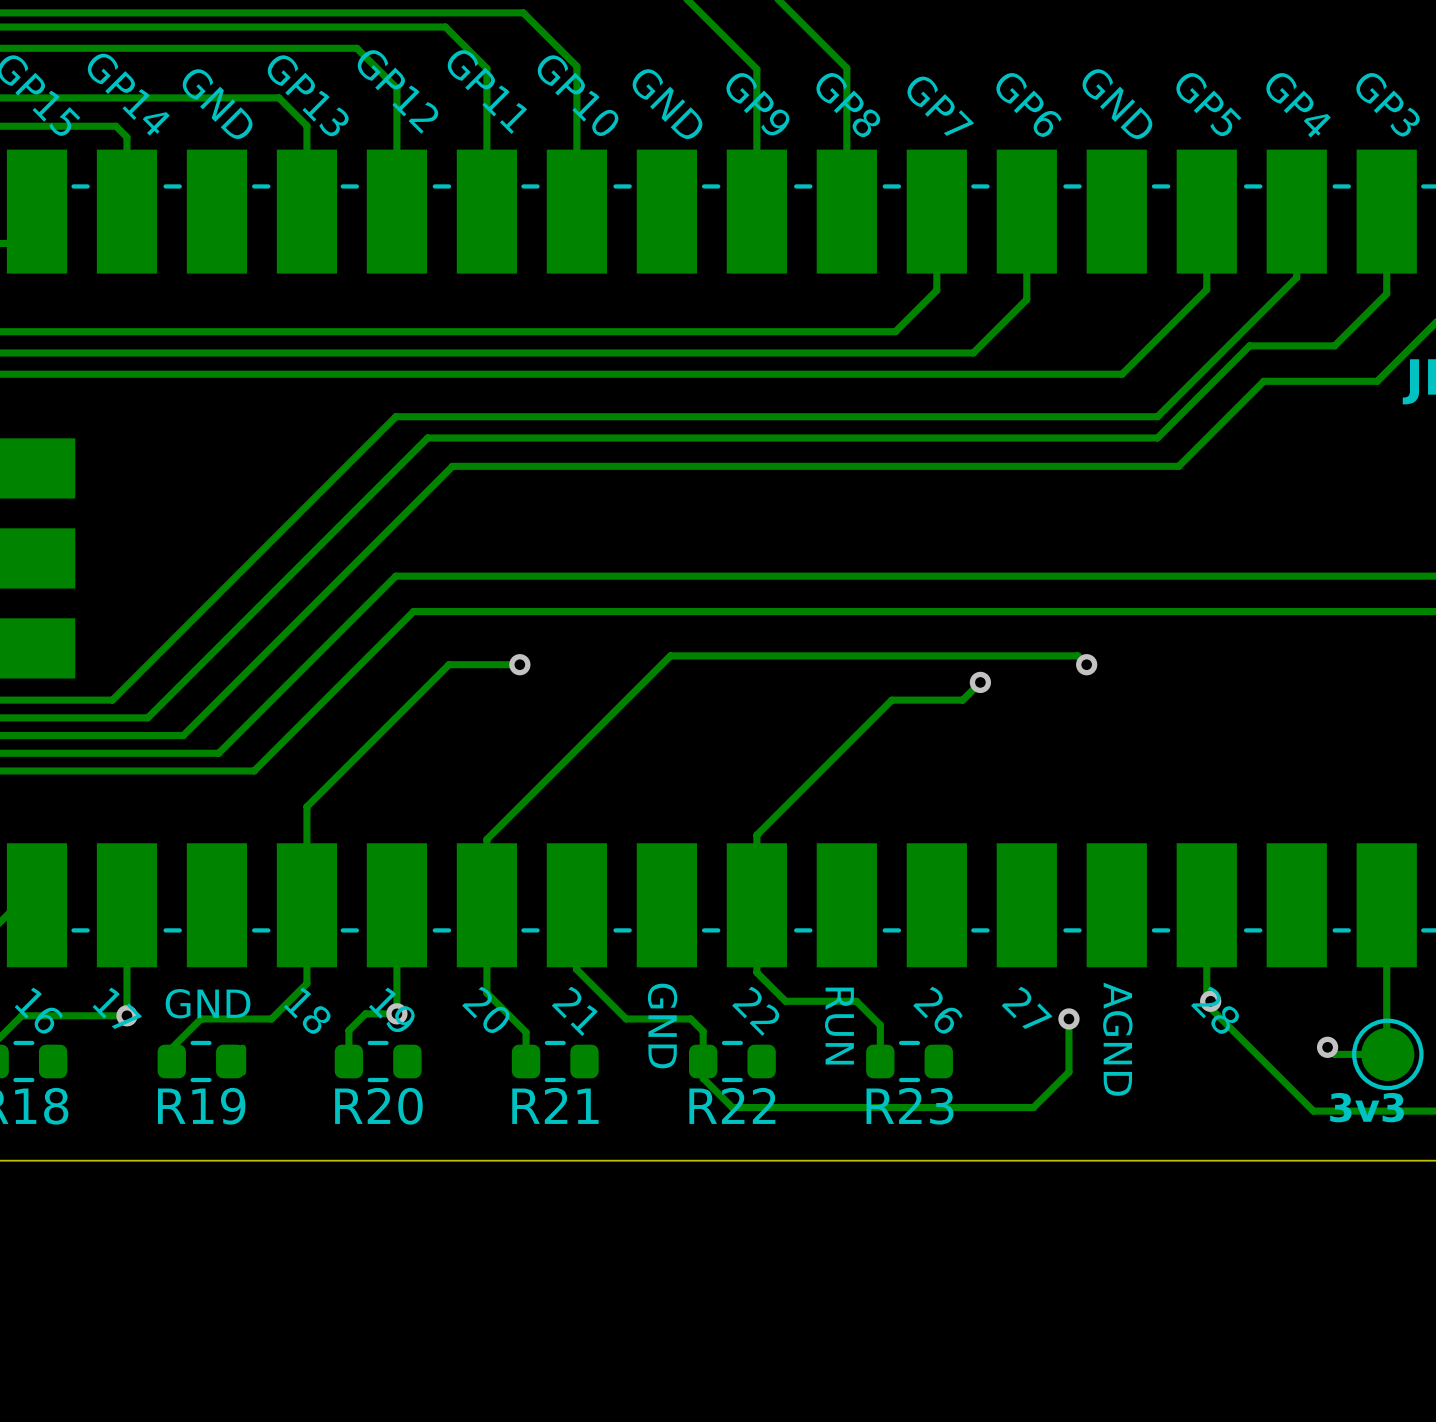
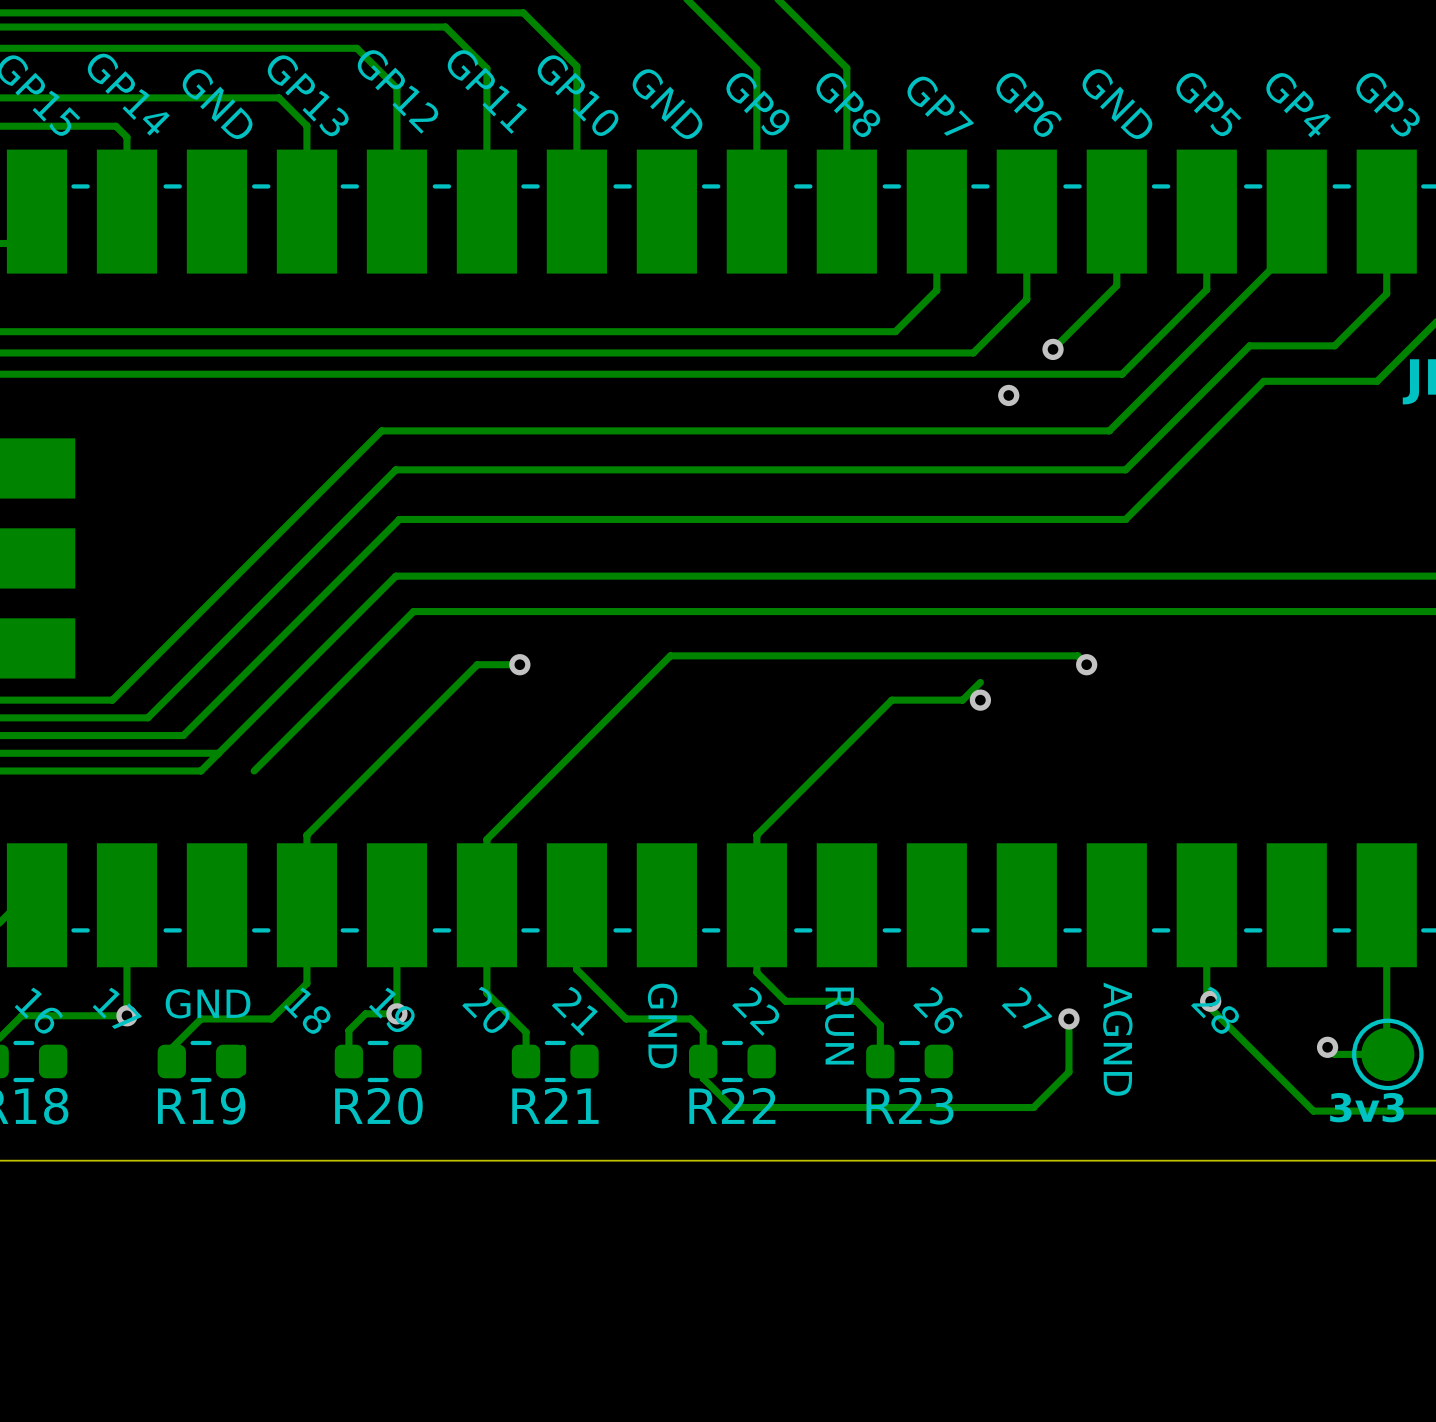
track: none -> (1116, 243) (1116, 285) (1053, 349)
track: (1296, 243) (1296, 277) (1157, 416) (395, 416) (381, 430) -> (1296, 243) (1109, 430) (381, 430)
via: none -> (1053, 349)
via: none -> (1008, 395)
track: (1157, 437) (427, 437) (395, 469) -> (1157, 437) (1125, 469) (395, 469)
track: (1178, 466) (452, 466) (399, 519) -> (1178, 466) (1125, 519) (399, 519)
track: (477, 664) (449, 664) (306, 806) (306, 835) -> (477, 664) (306, 835)
via position: (980, 682) -> (980, 700)
track: (254, 770) (201, 770) -> (218, 753) (201, 770)

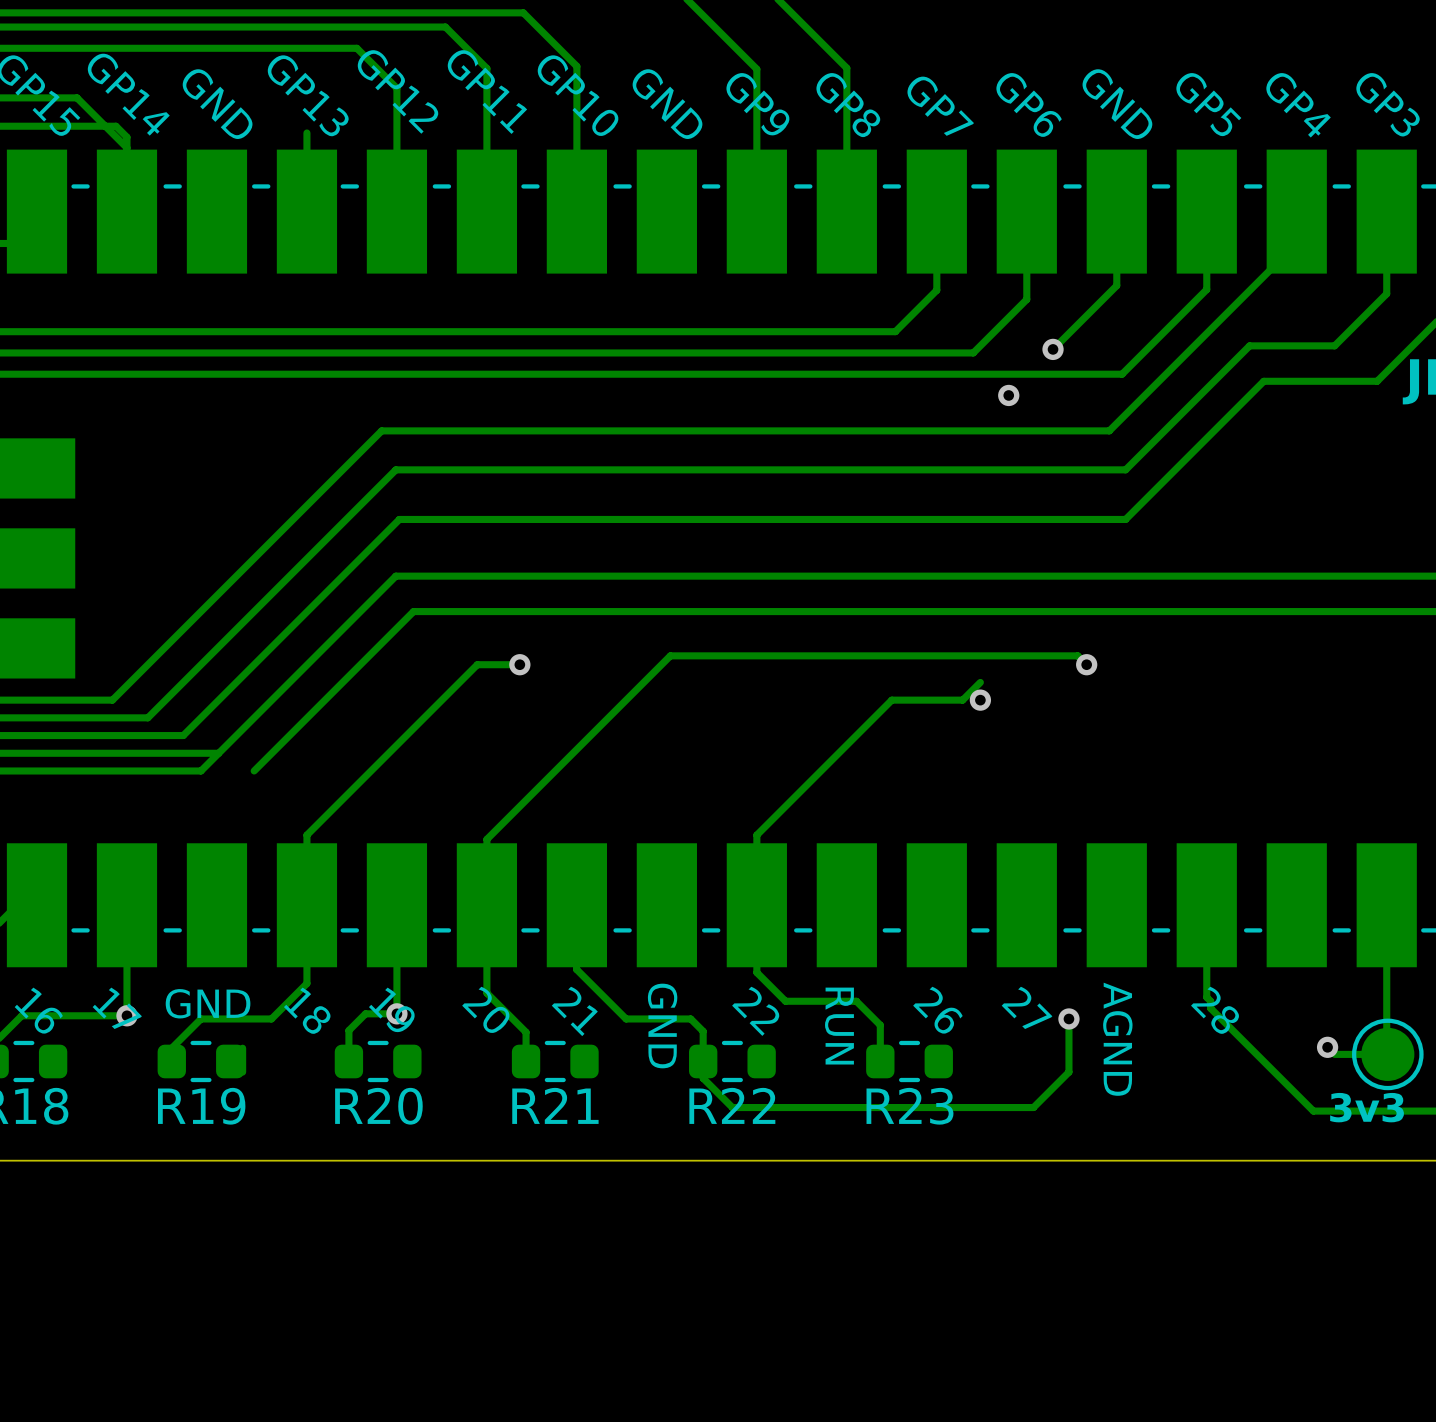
track: (77, 97) (278, 97) (306, 125) (306, 132) -> (77, 97) (126, 147)
via: (1210, 1001) -> none

